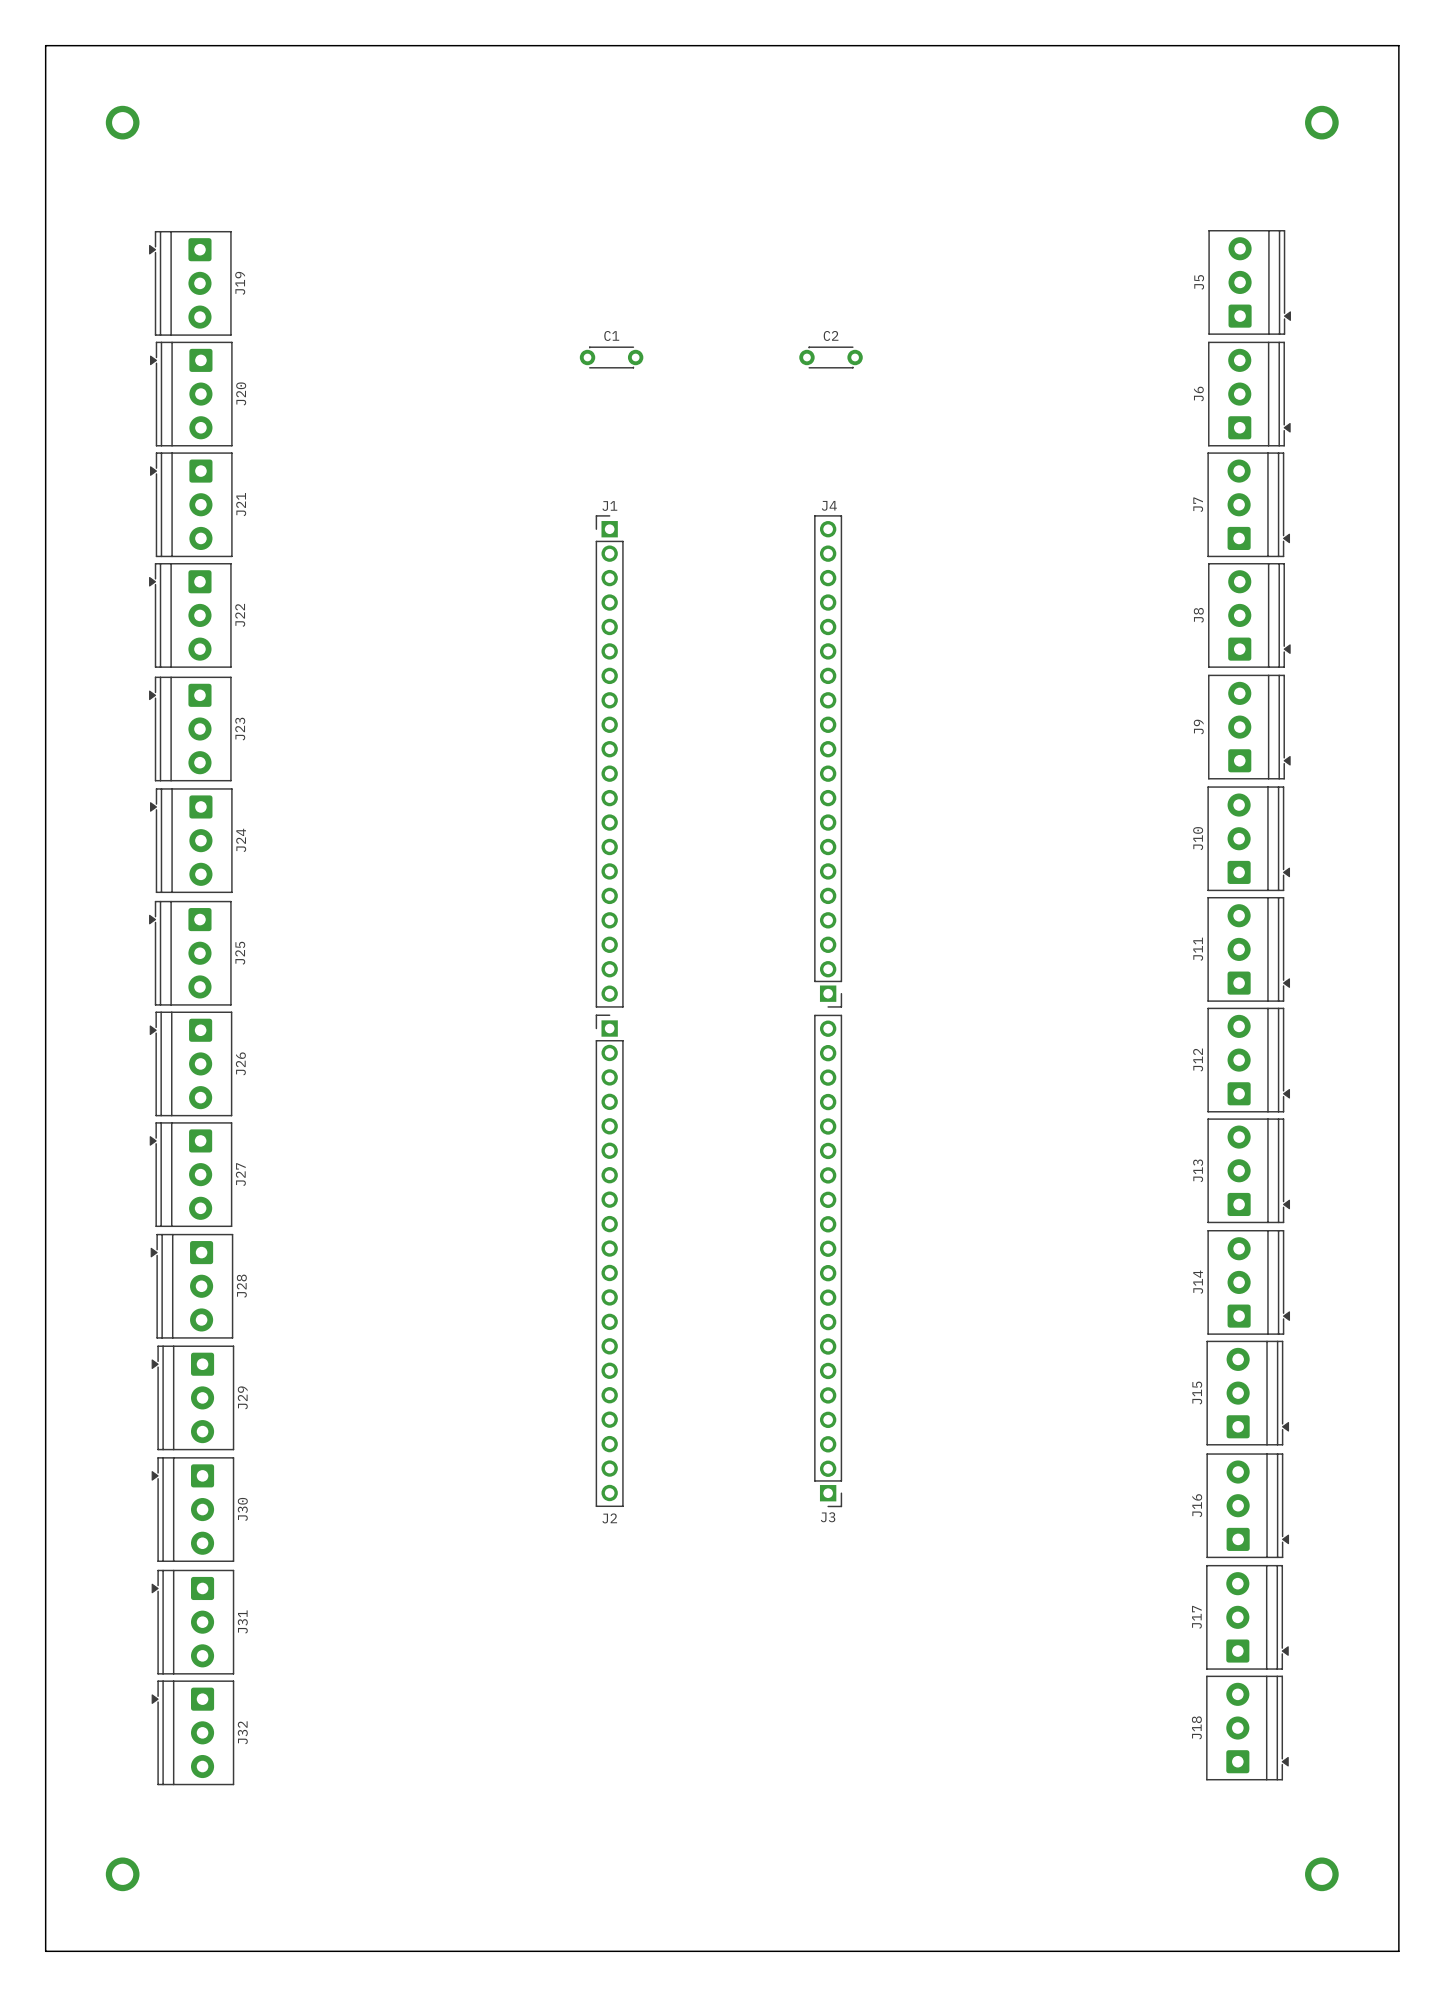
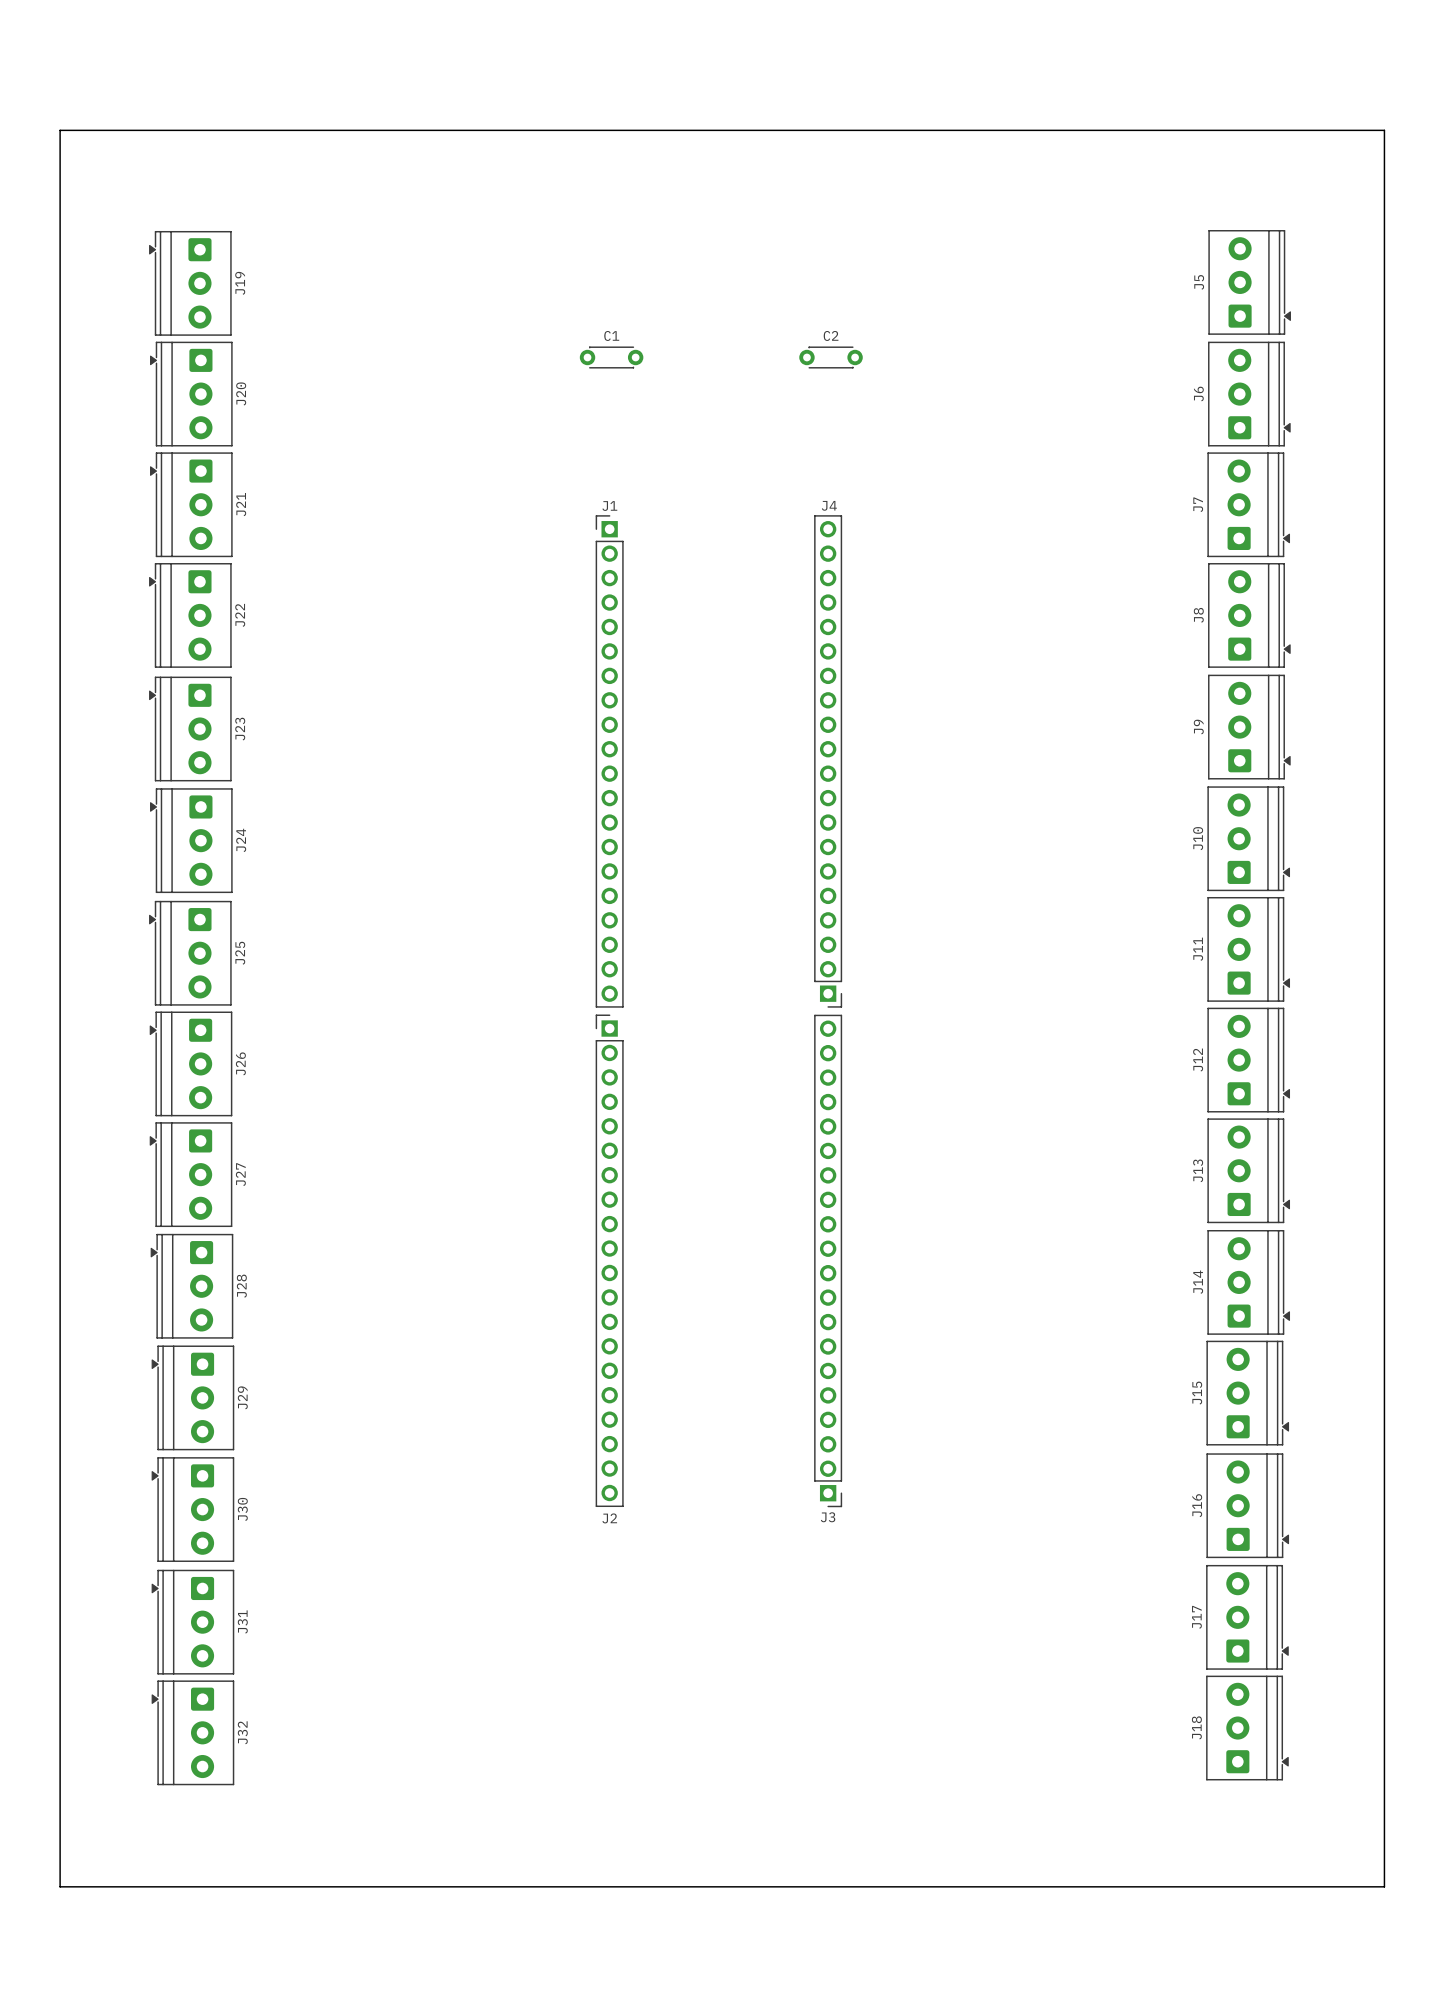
board edge: (45, 45) (1398, 45) (1398, 1951) (45, 1951) (45, 45) -> (60, 130) (60, 1886) (1384, 1886) (1384, 130) (60, 130)
part: (122, 122) -> none
part: (1321, 122) -> none
part: (122, 1874) -> none
part: (1321, 1874) -> none

